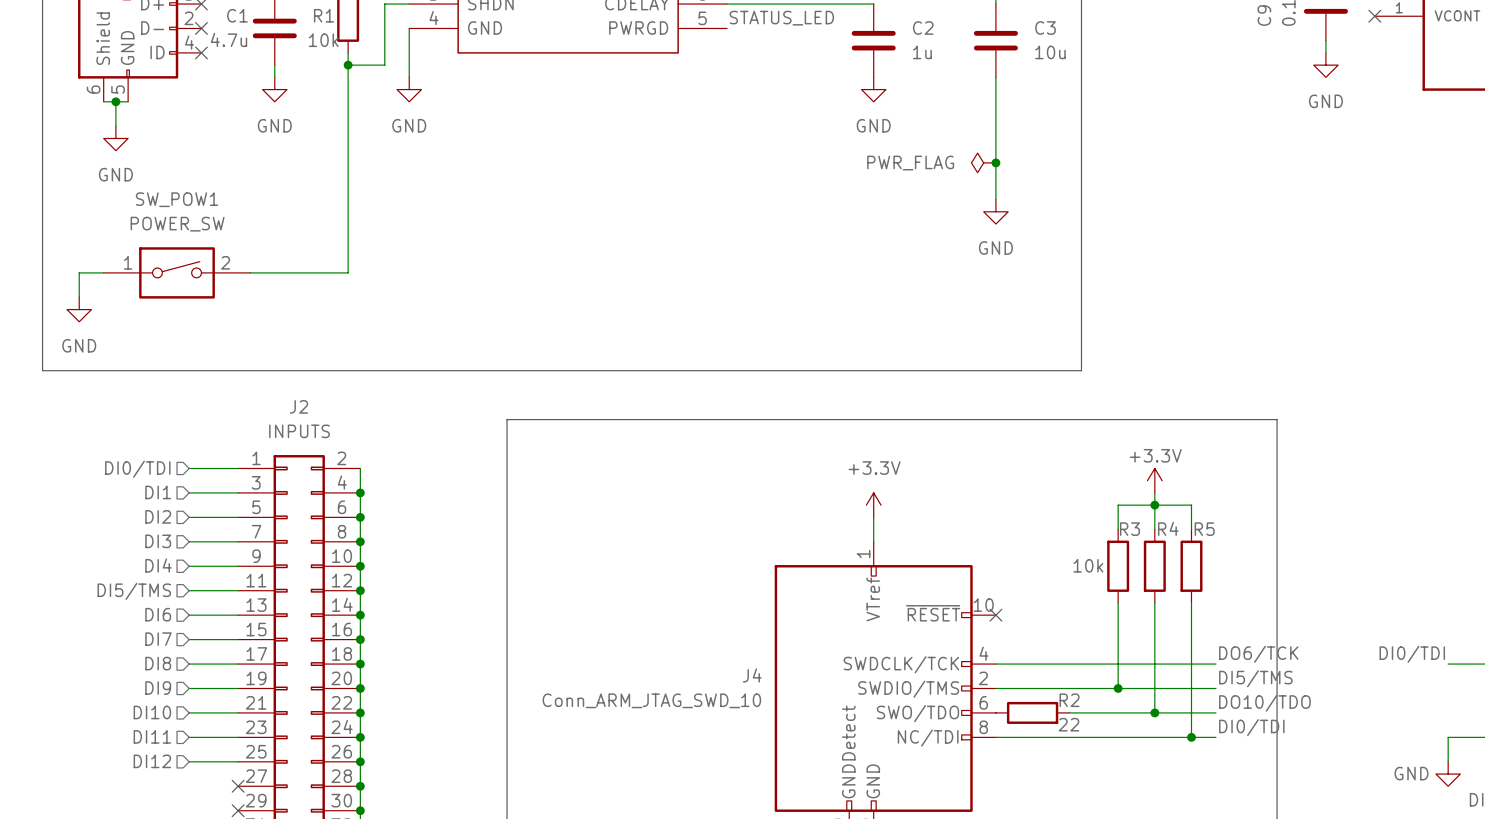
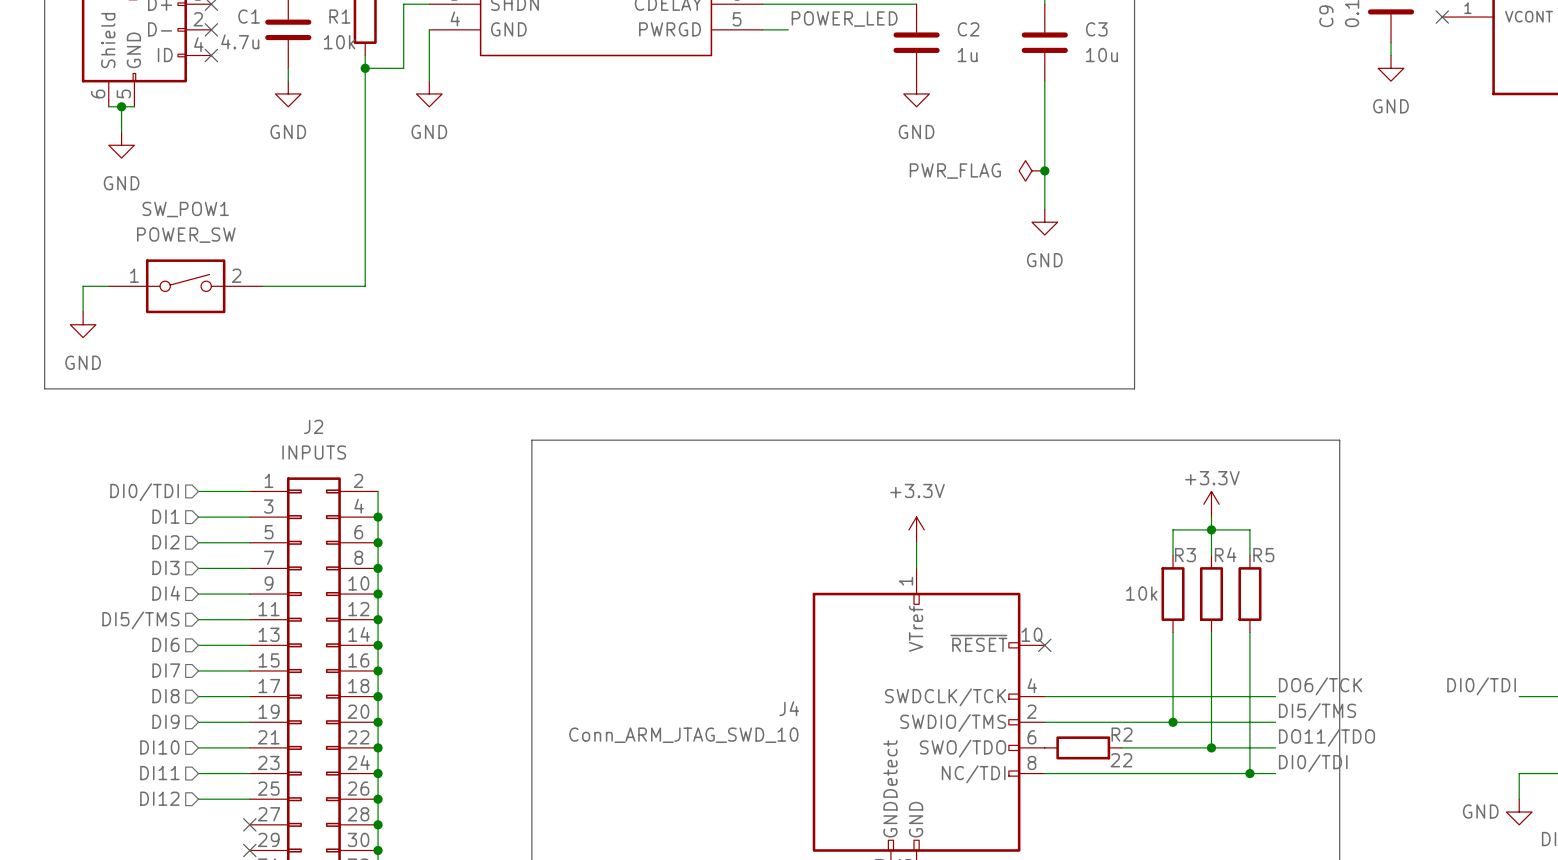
label: STATUS_LED (781, 18) -> none
label: none -> POWER_LED (844, 19)
wire: none -> (762, 29) (788, 29)
label: DO10/TDO (1264, 703) -> DO11/TDO (1326, 737)

